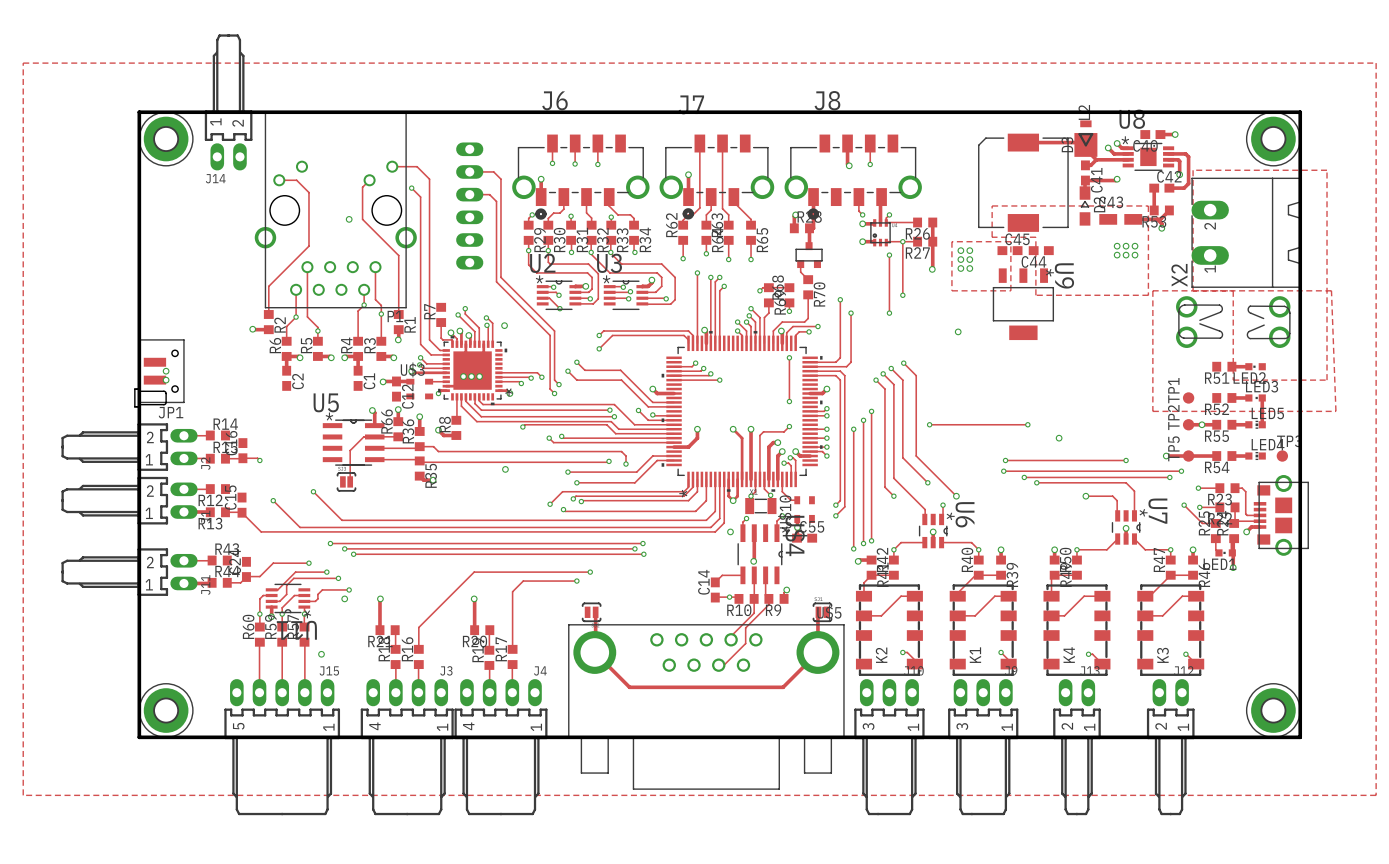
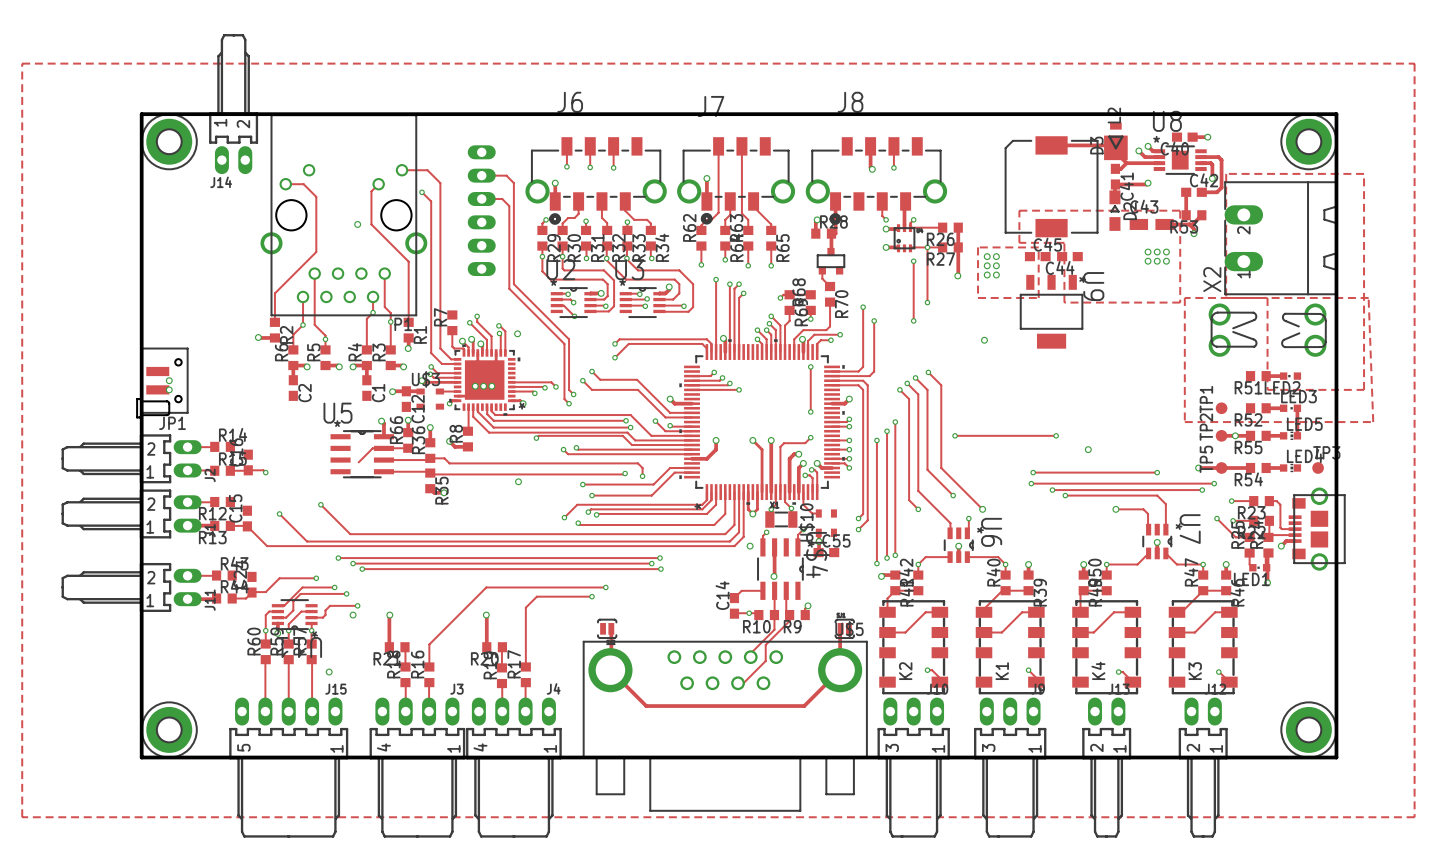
track: (350, 450) (350, 481) -> none
part: (346, 481) -> none

